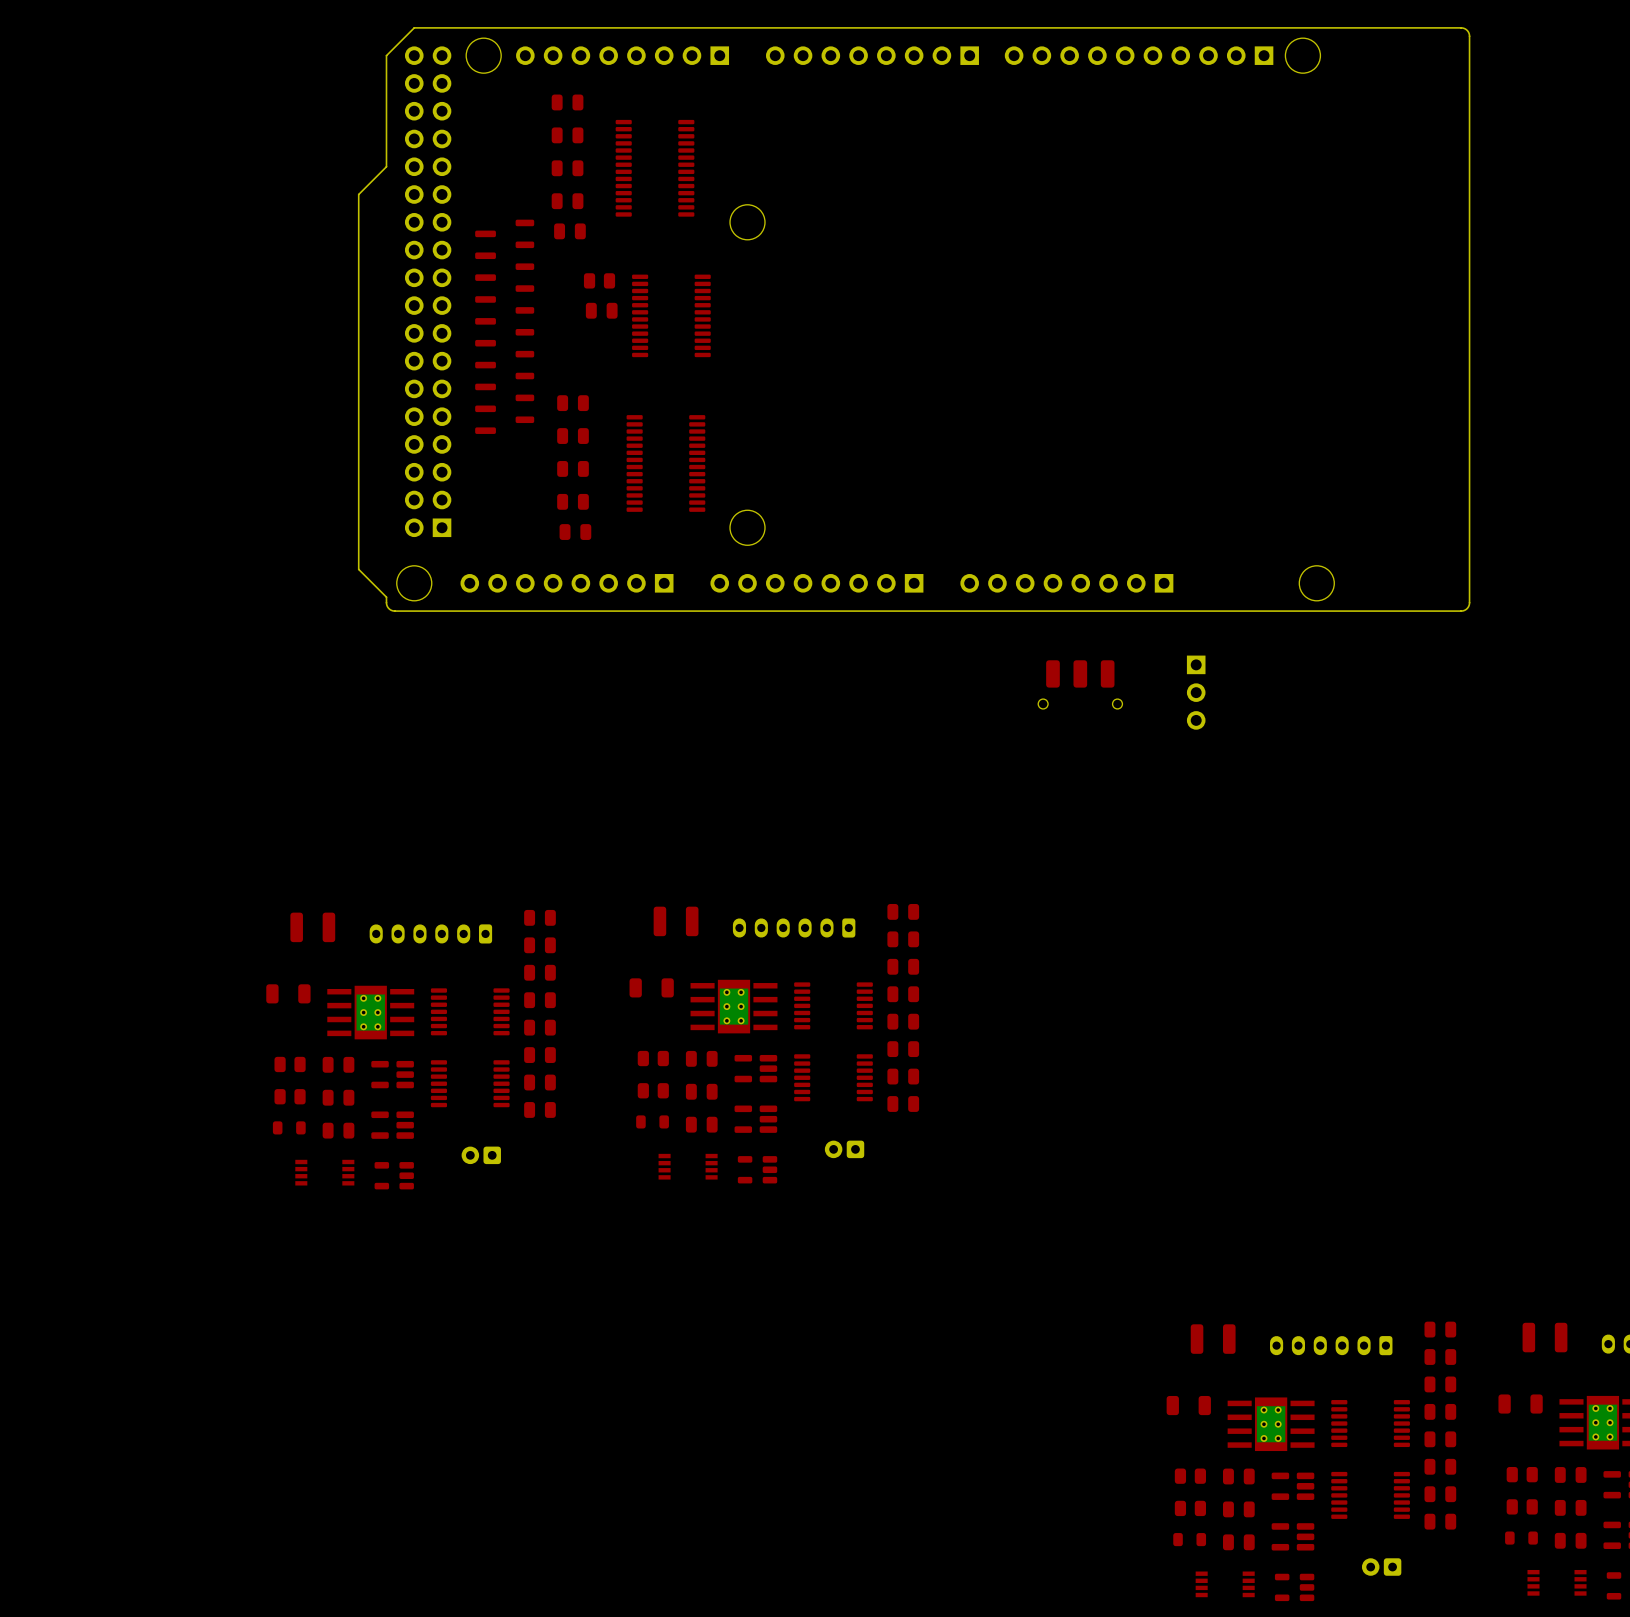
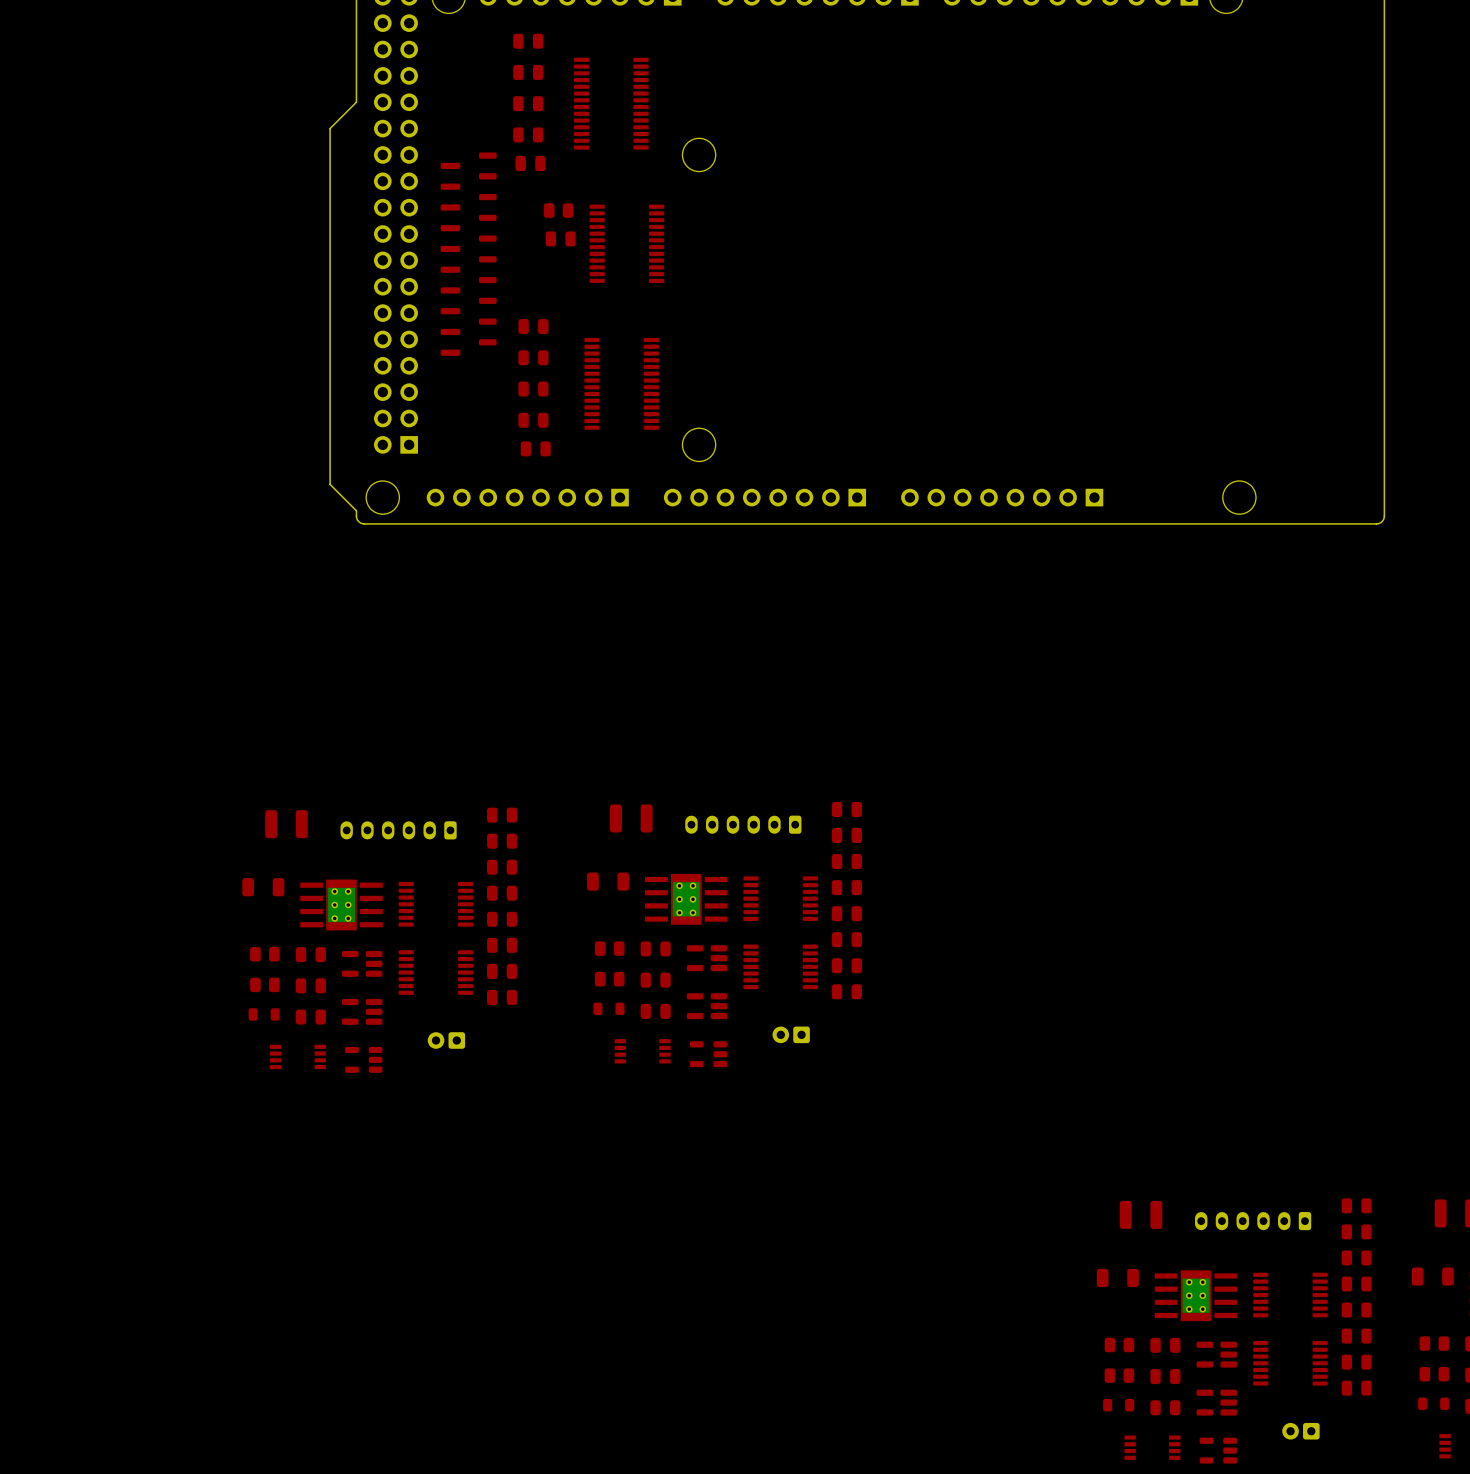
part: (1080, 684) -> none
part: (1196, 692) -> none

